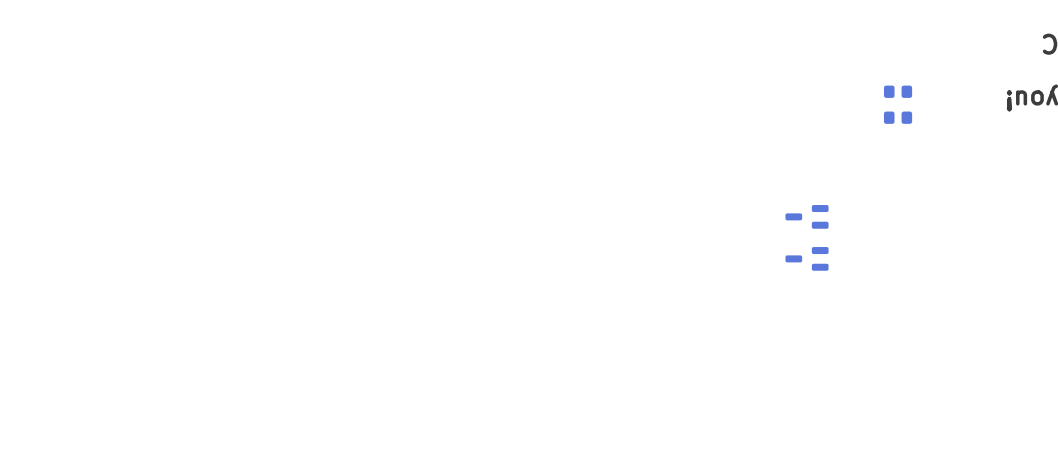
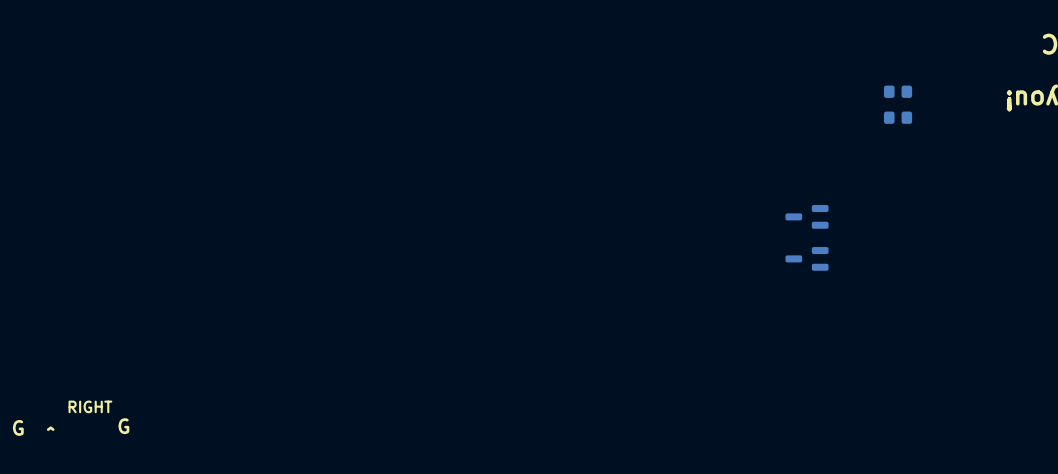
text: none -> RIGHT (90, 406)
text: none -> G (123, 426)
text: none -> G (18, 427)
text: none -> ^ (50, 428)

